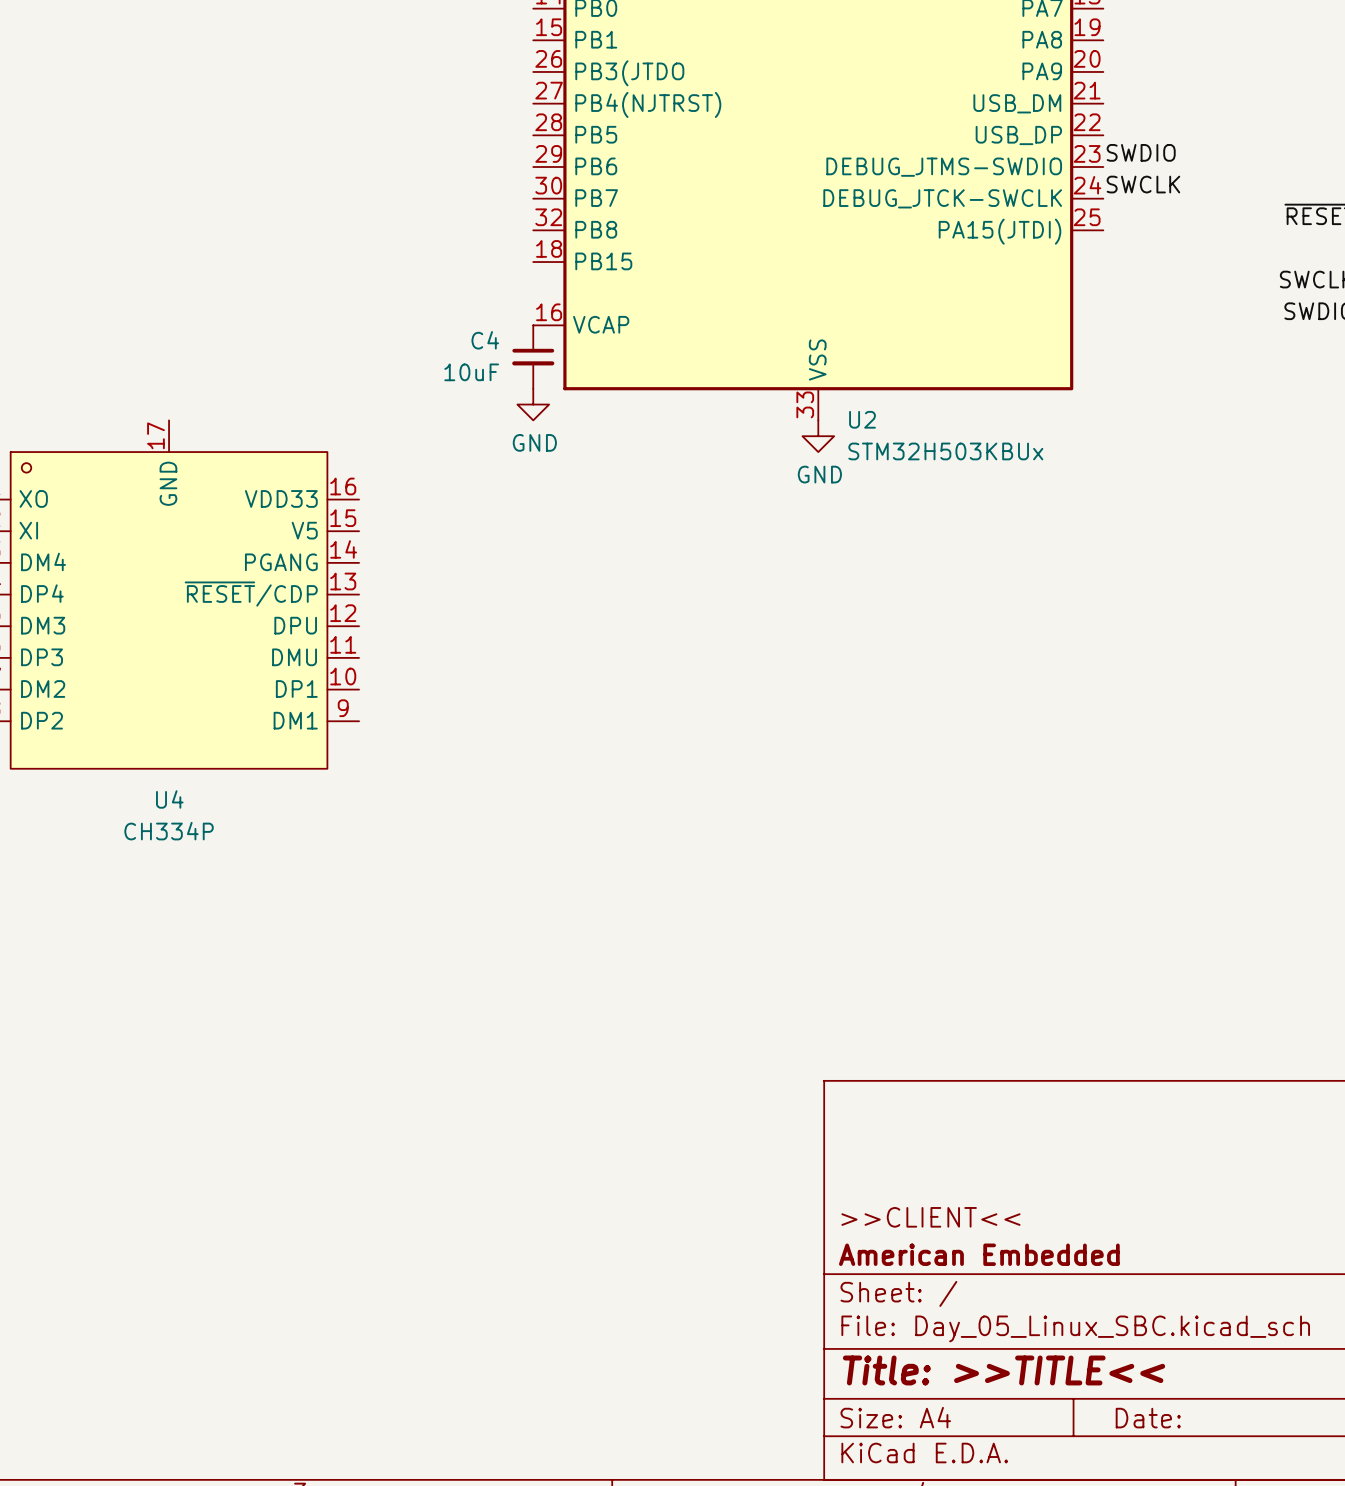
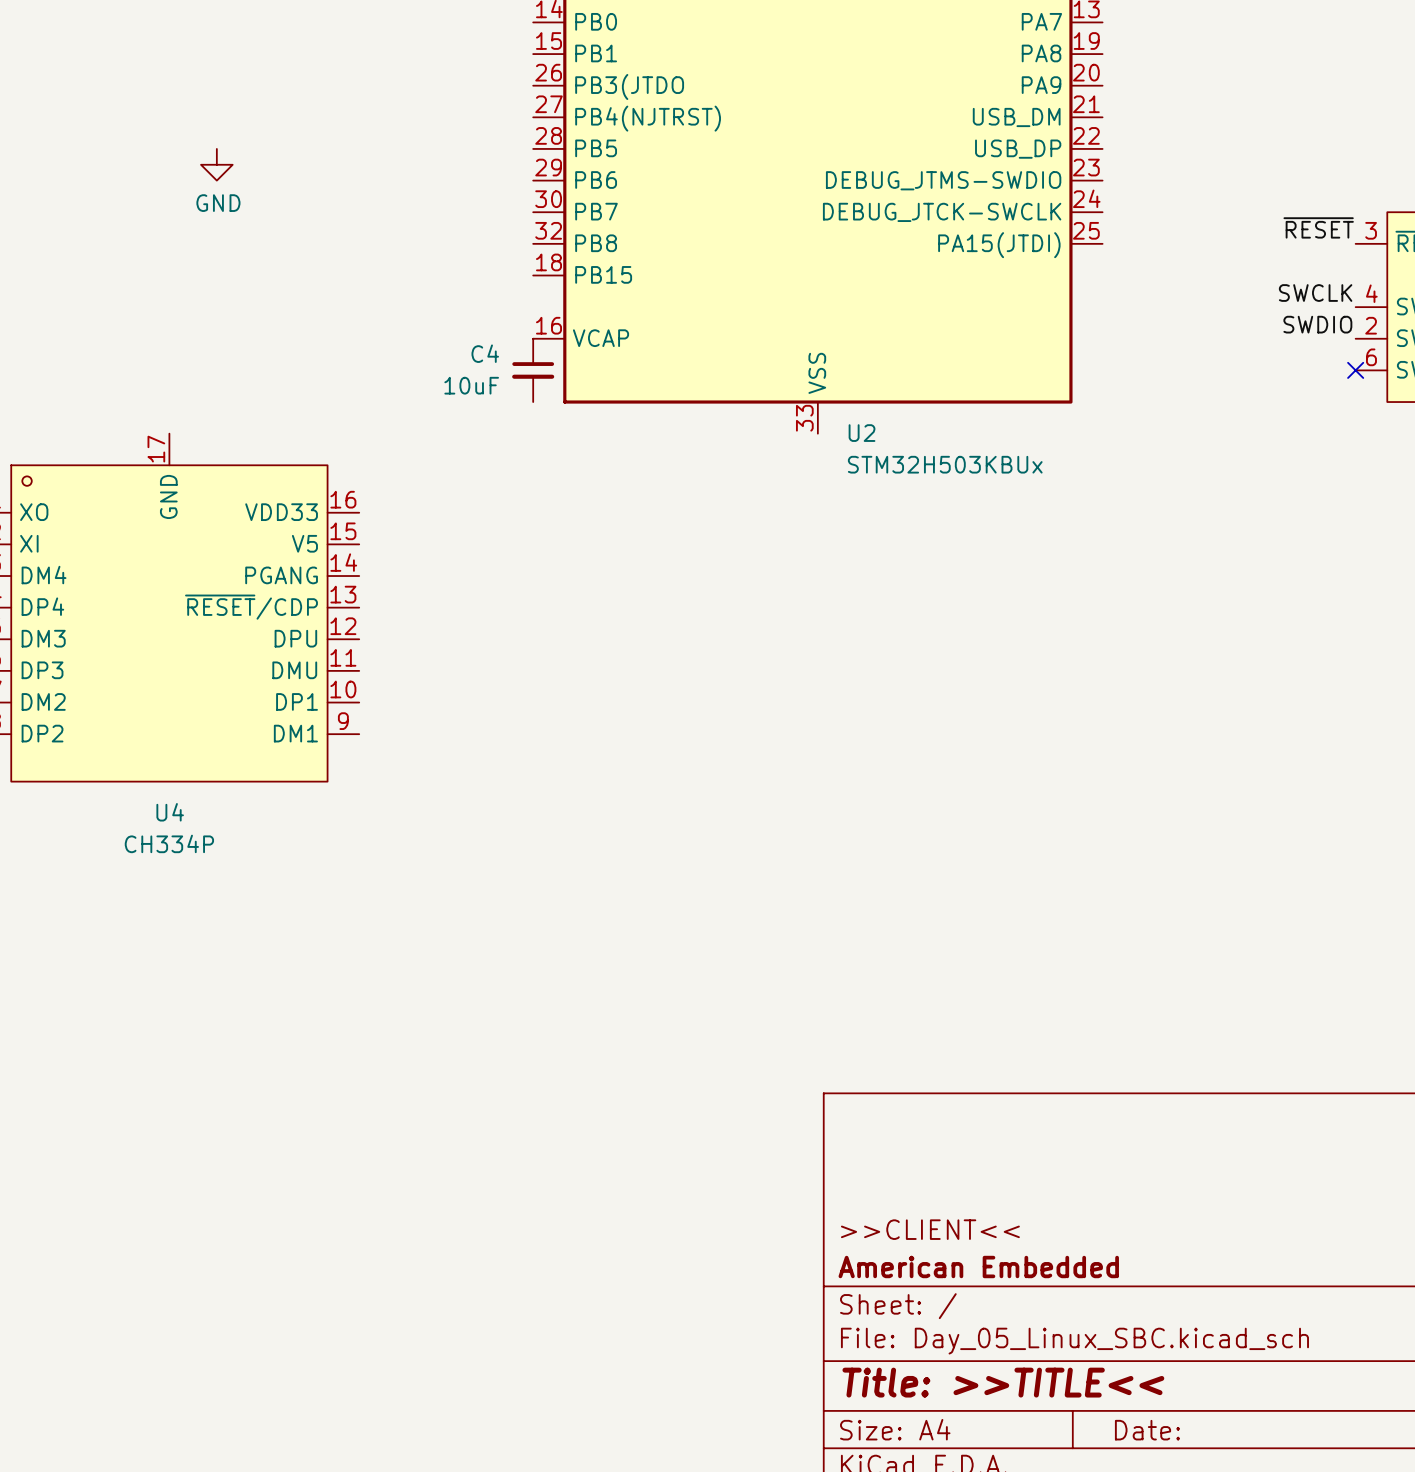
power symbol: none -> GND (216, 164)
label: SWDIO (1141, 152) -> none
label: SWCLK (1143, 184) -> none
power symbol: GND (533, 404) -> none
power symbol: GND (818, 436) -> none

